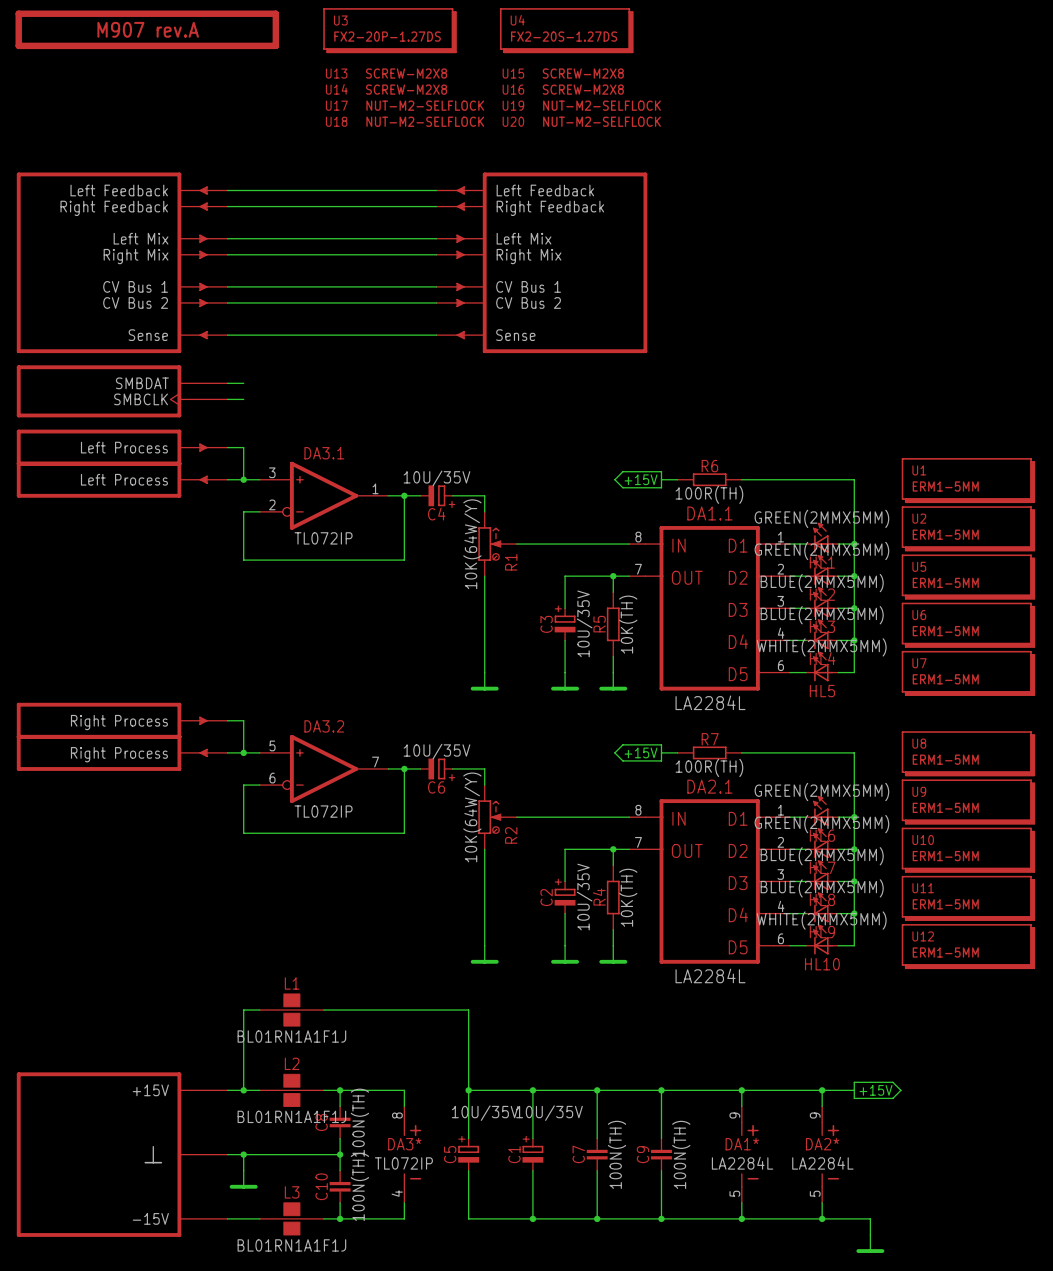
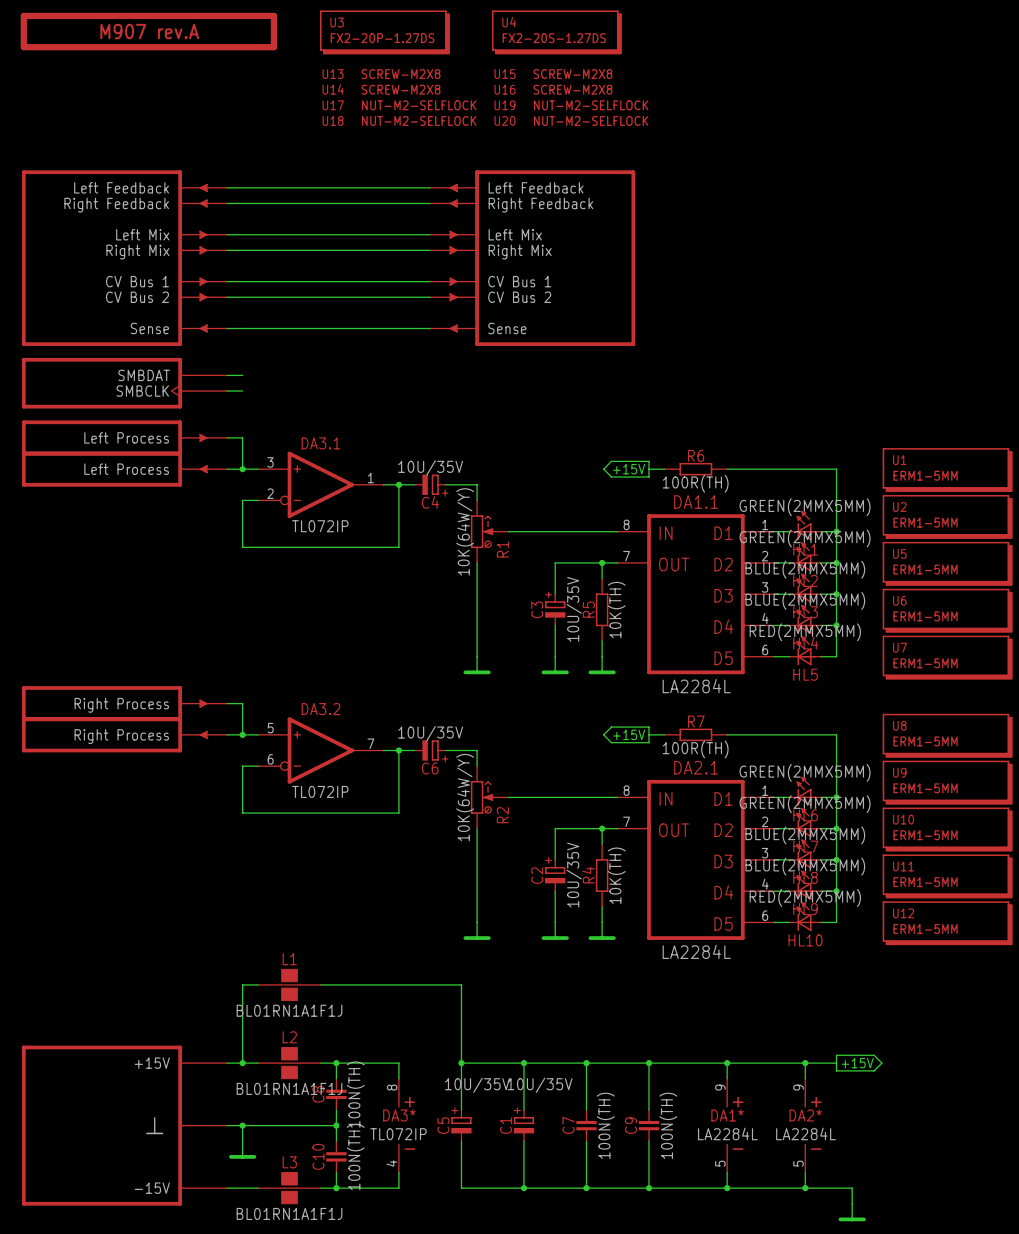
HL5 value: WHITE(2MMX5MM) (821, 647) -> RED(2MMX5MM) (805, 632)
HL10 value: WHITE(2MMX5MM) (821, 920) -> RED(2MMX5MM) (805, 897)

